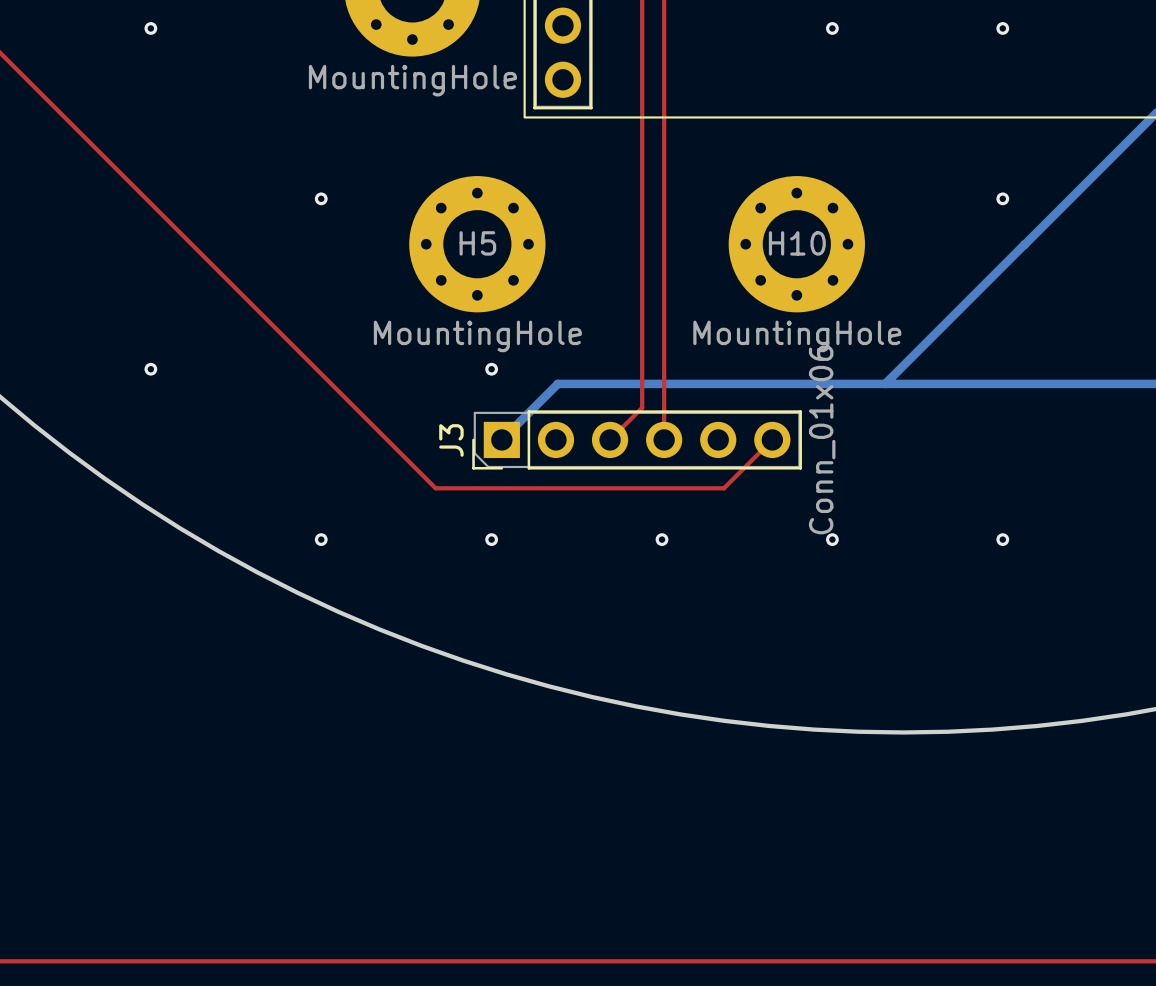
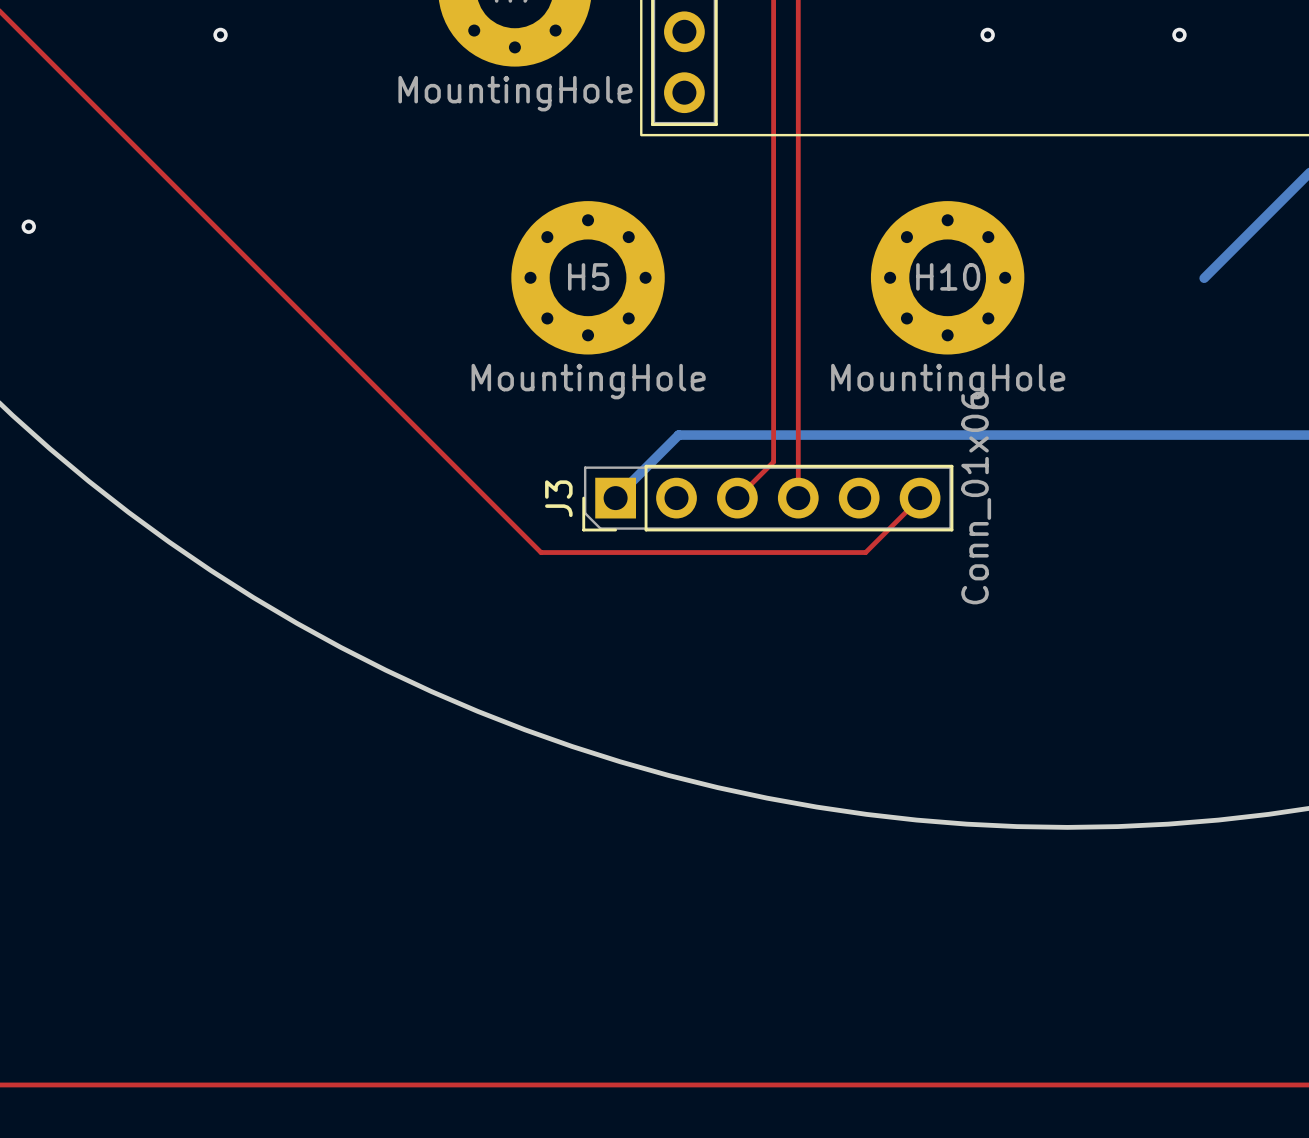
via: (321, 198) -> none
via: (1002, 198) -> none
bottom track: (1024, 244) (885, 383) -> none
via: (150, 369) -> none
via: (491, 369) -> none
via: (321, 539) -> none
via: (491, 539) -> none
via: (662, 539) -> none
via: (832, 539) -> none
via: (1002, 539) -> none

